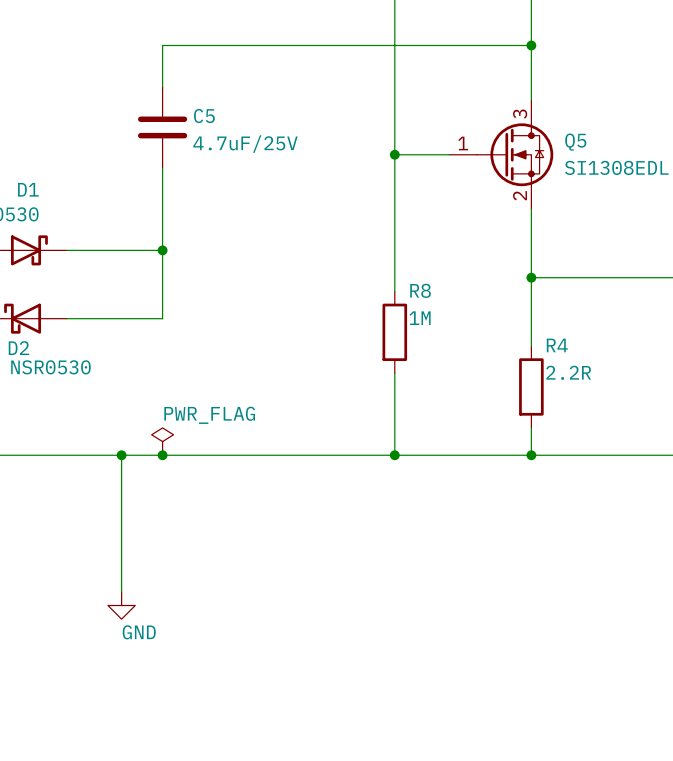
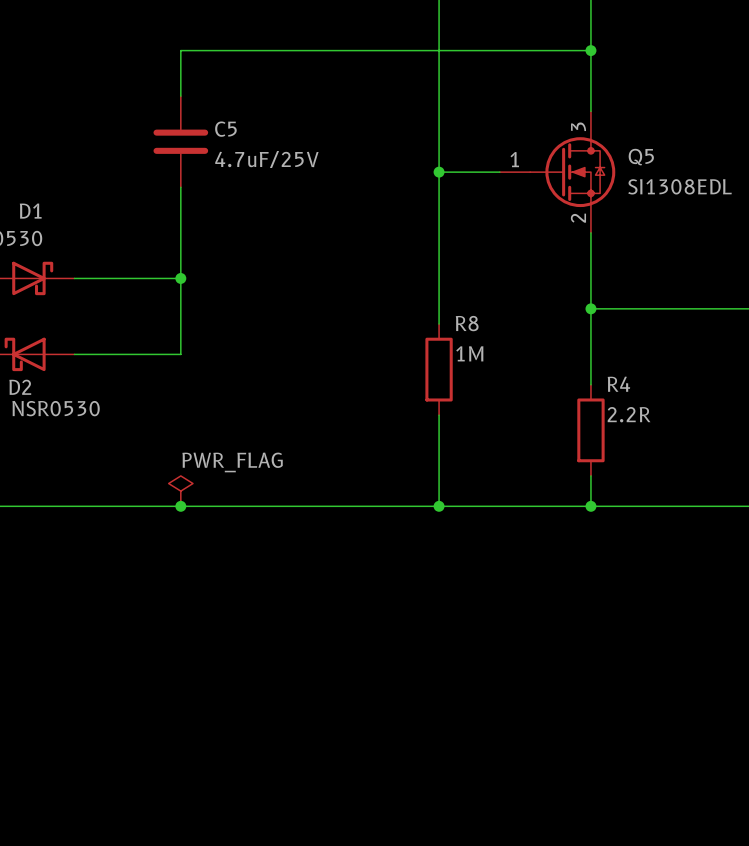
wire: (121, 455) (121, 591) -> none
junction: (121, 455) -> none
power symbol: GND (121, 605) -> none

